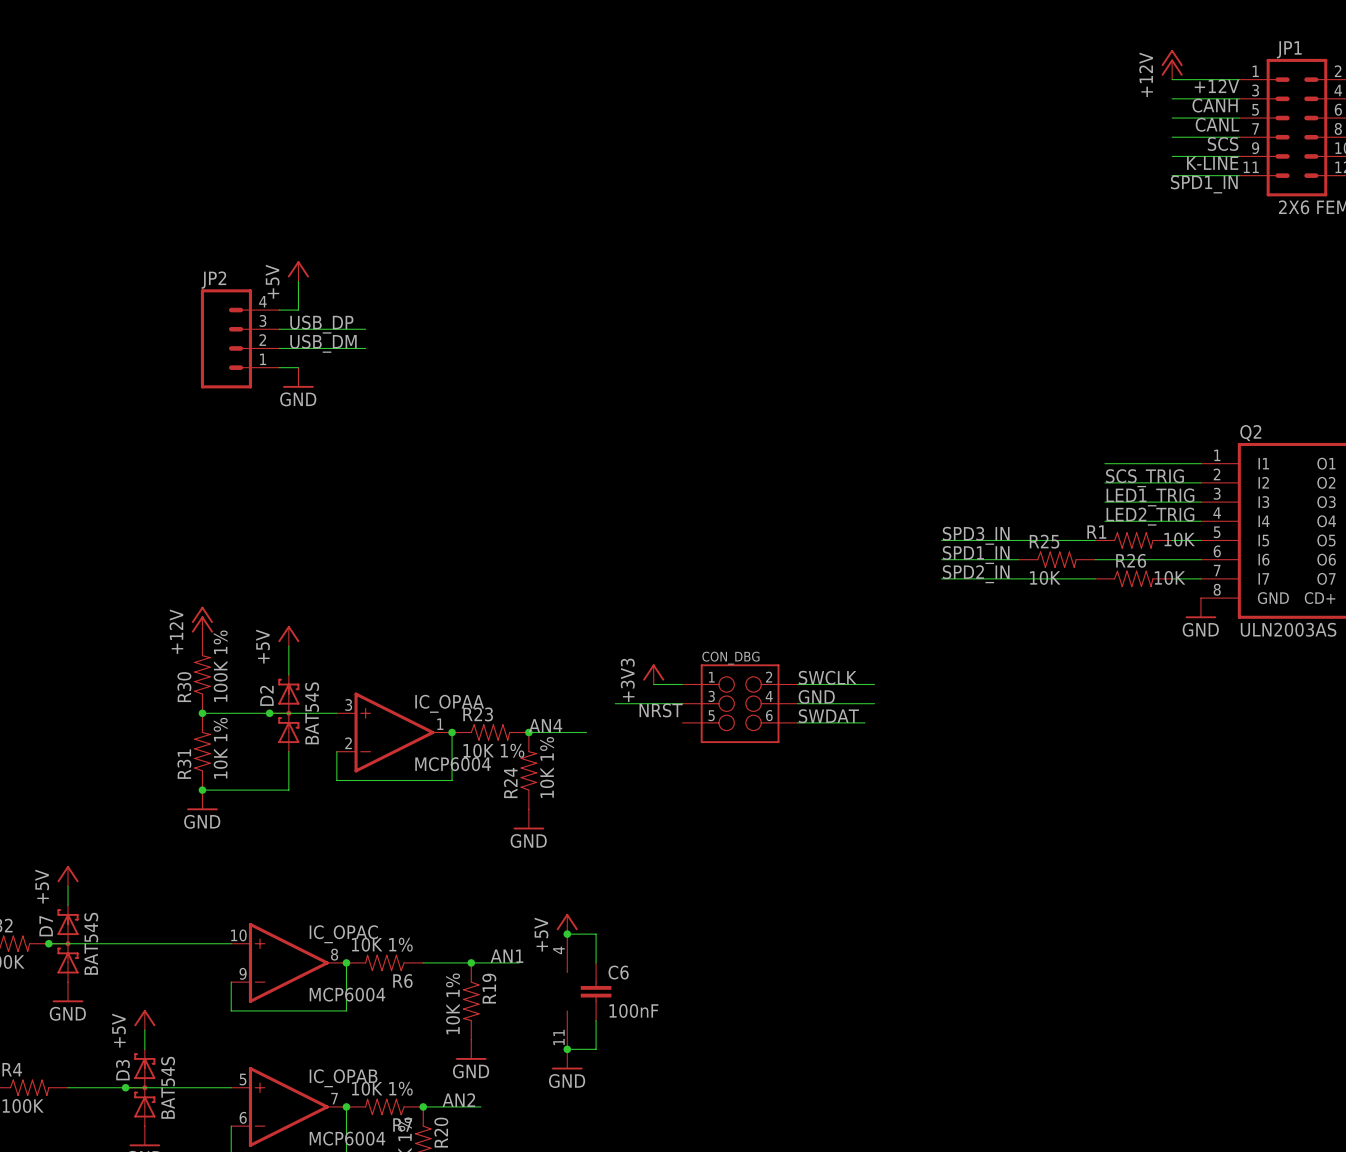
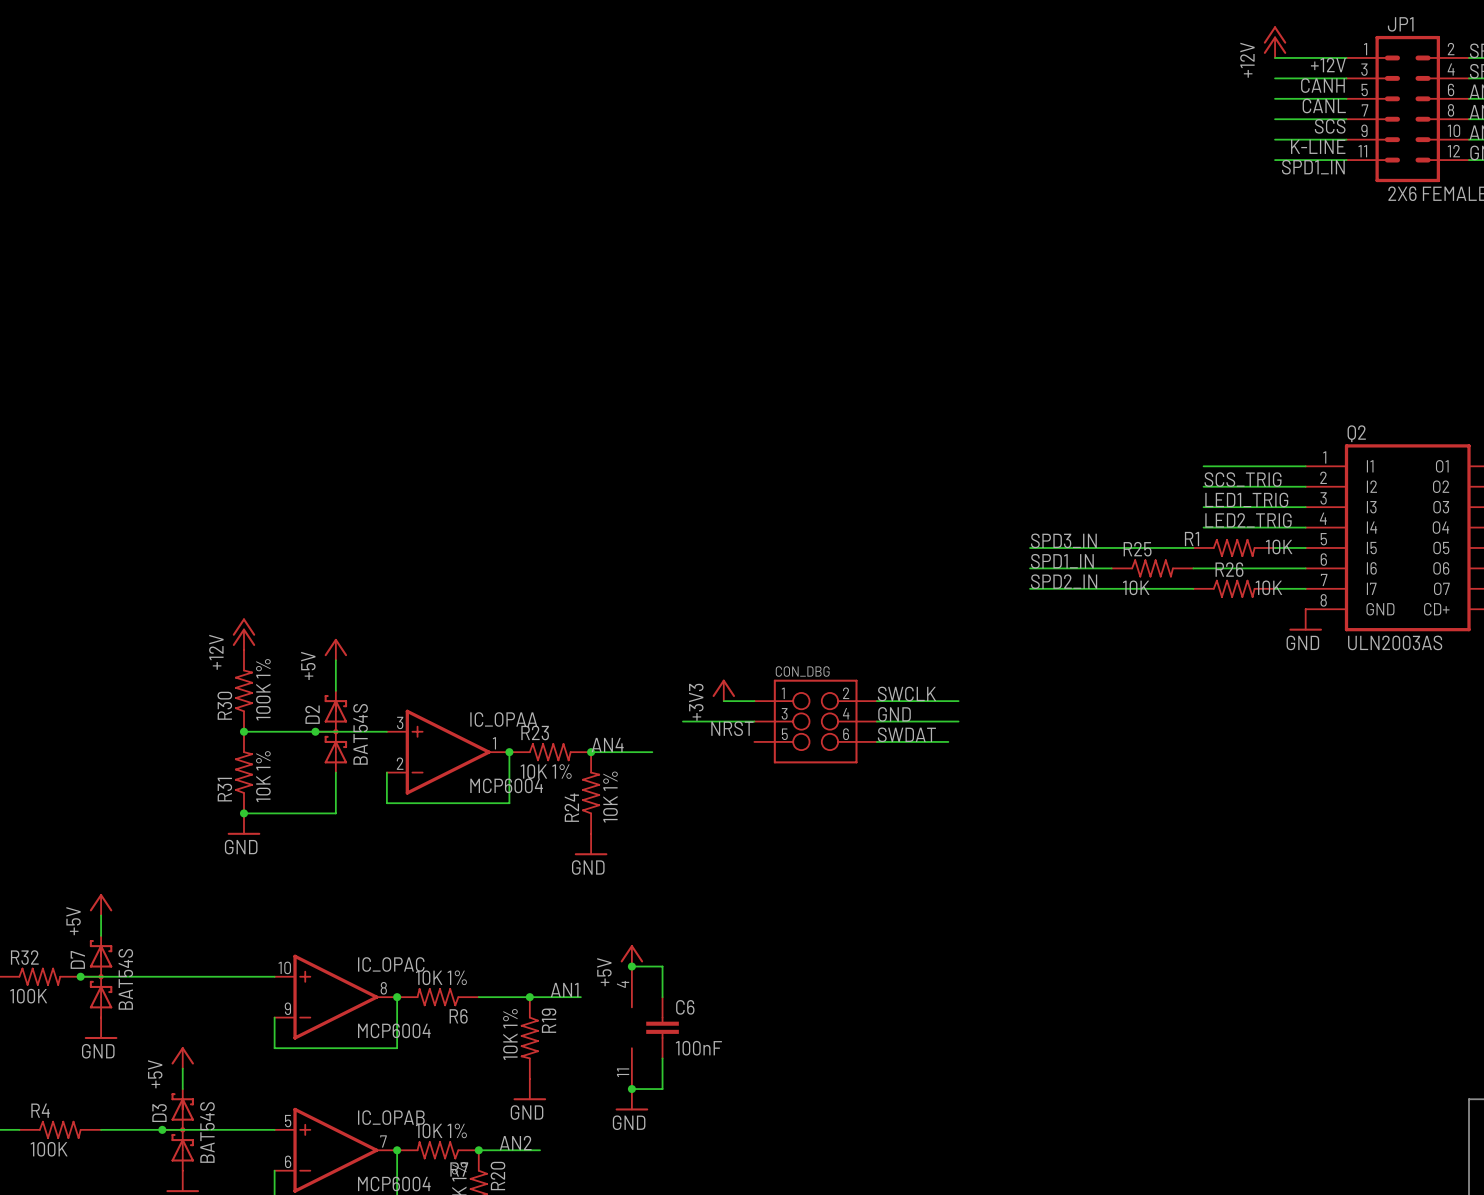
power symbol: +5V (298, 271) -> none
wire: (298, 281) (298, 310) (279, 310) -> none
label: USB_DP (321, 324) -> none
wire: (279, 329) (365, 329) -> none
JP2: (240, 338) -> none
label: USB_DM (323, 343) -> none
wire: (279, 348) (365, 348) -> none
wire: (279, 367) (298, 367) -> none
power symbol: GND (298, 377) -> none

